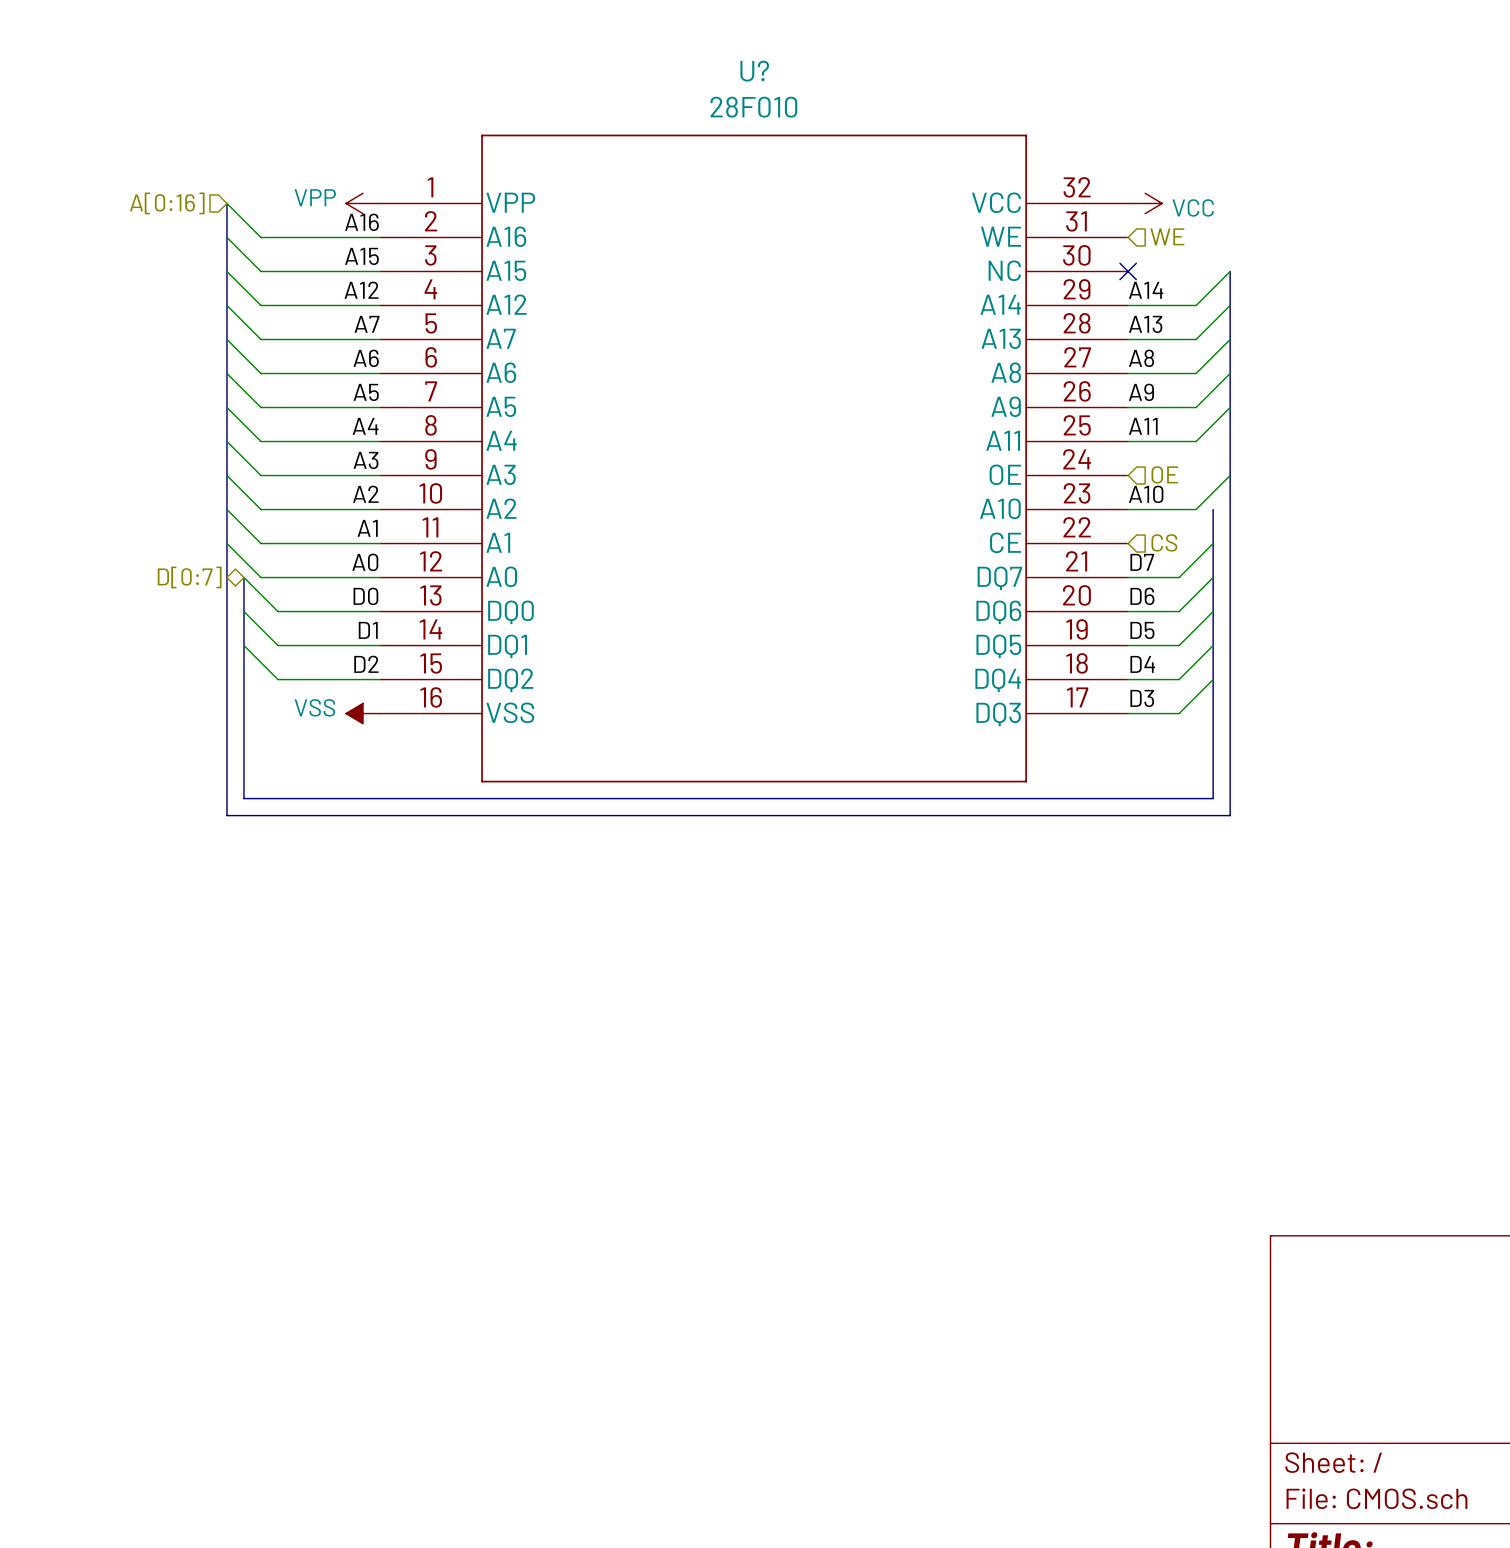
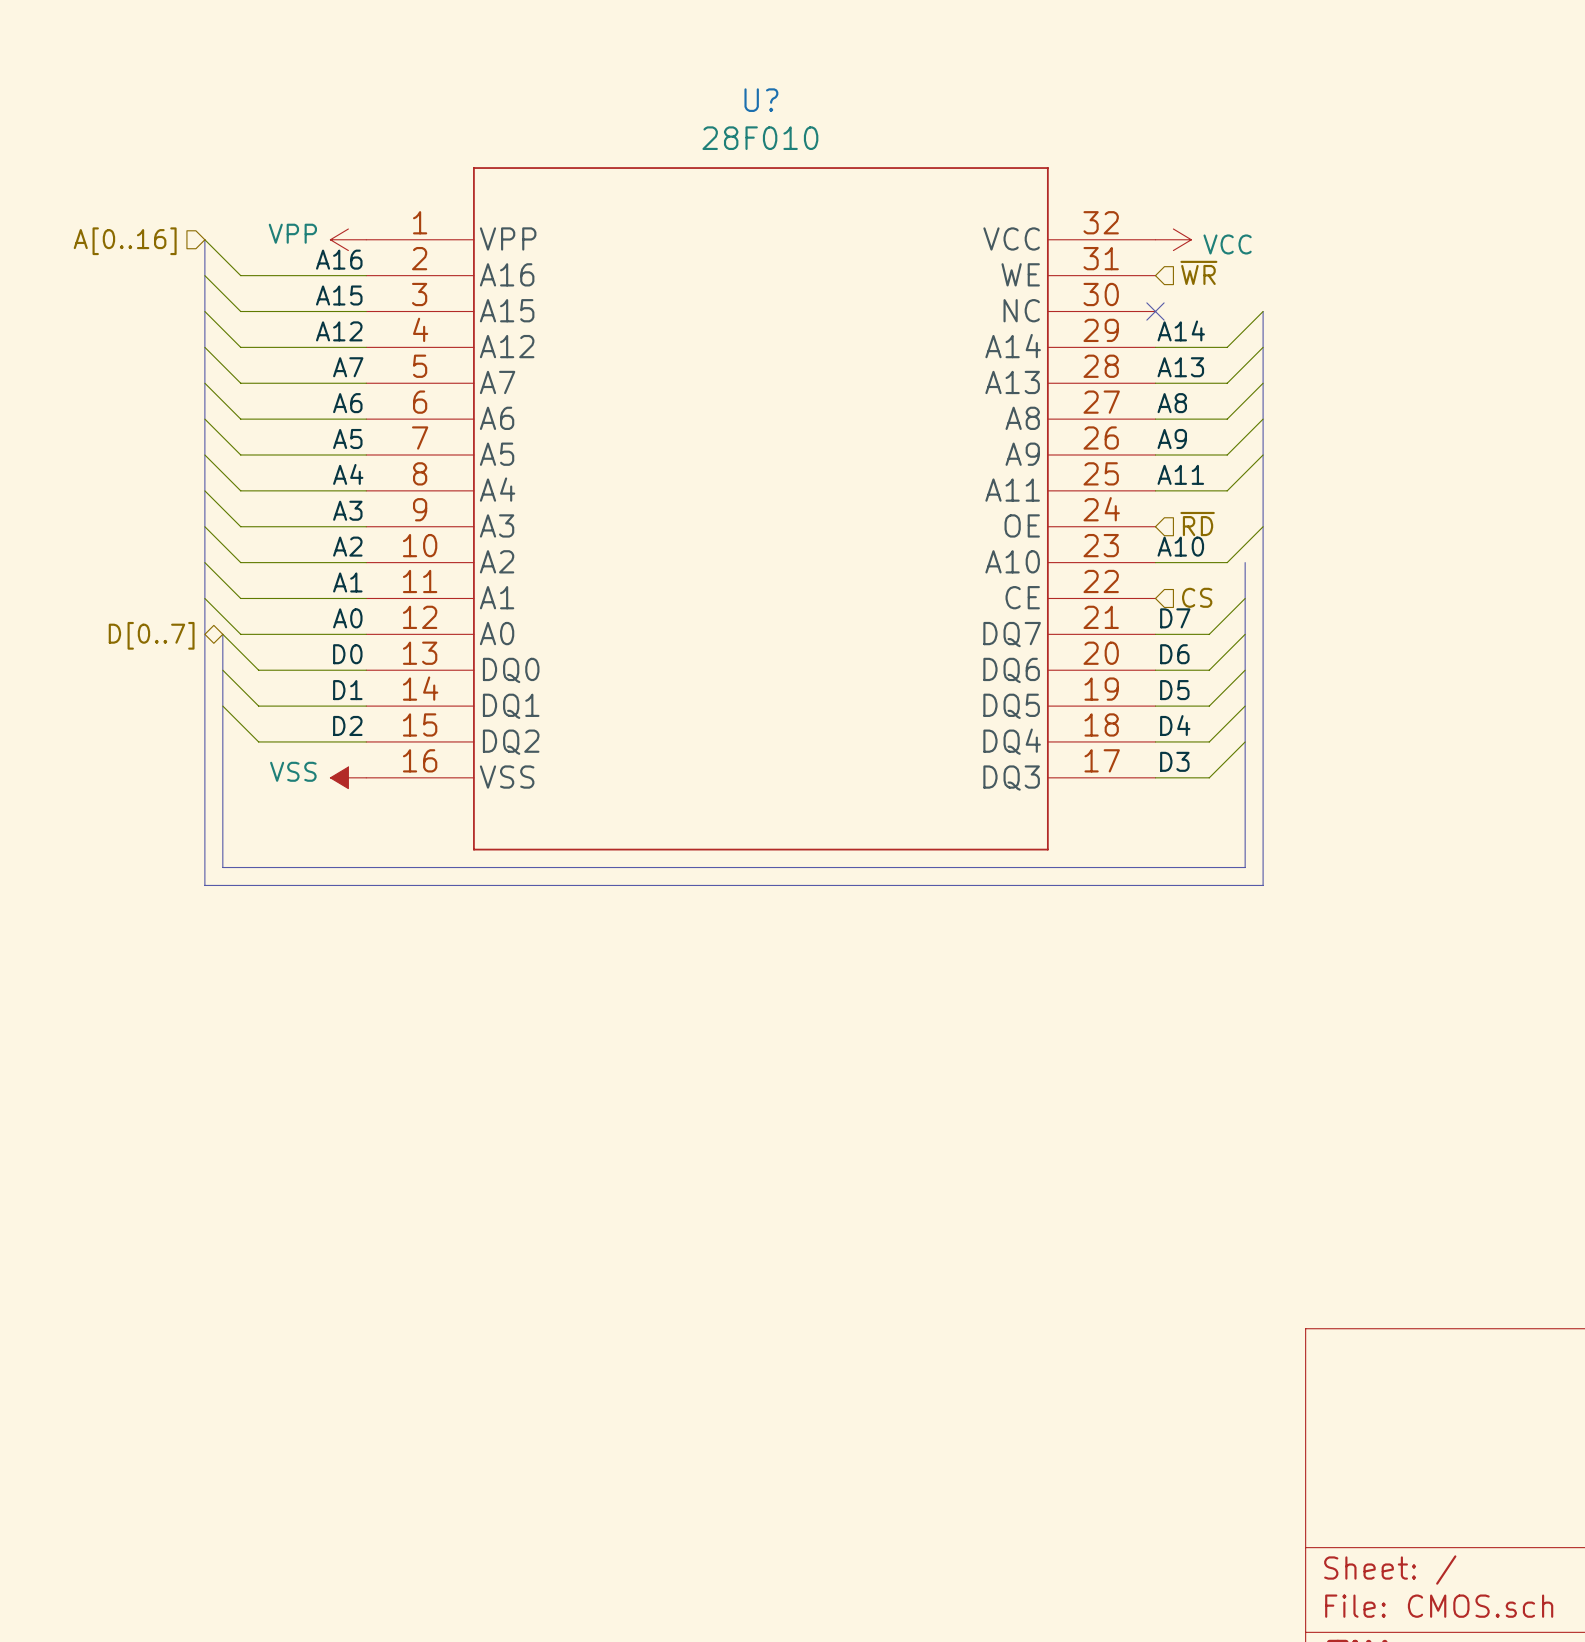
hierarchical label: A[0:16] (167, 203) -> A[0..16] (125, 241)
hierarchical label: WE (1167, 236) -> ~{WR} (1198, 272)
hierarchical label: OE (1164, 474) -> ~{RD} (1197, 524)
hierarchical label: D[0:7] (189, 577) -> D[0..7] (151, 635)

